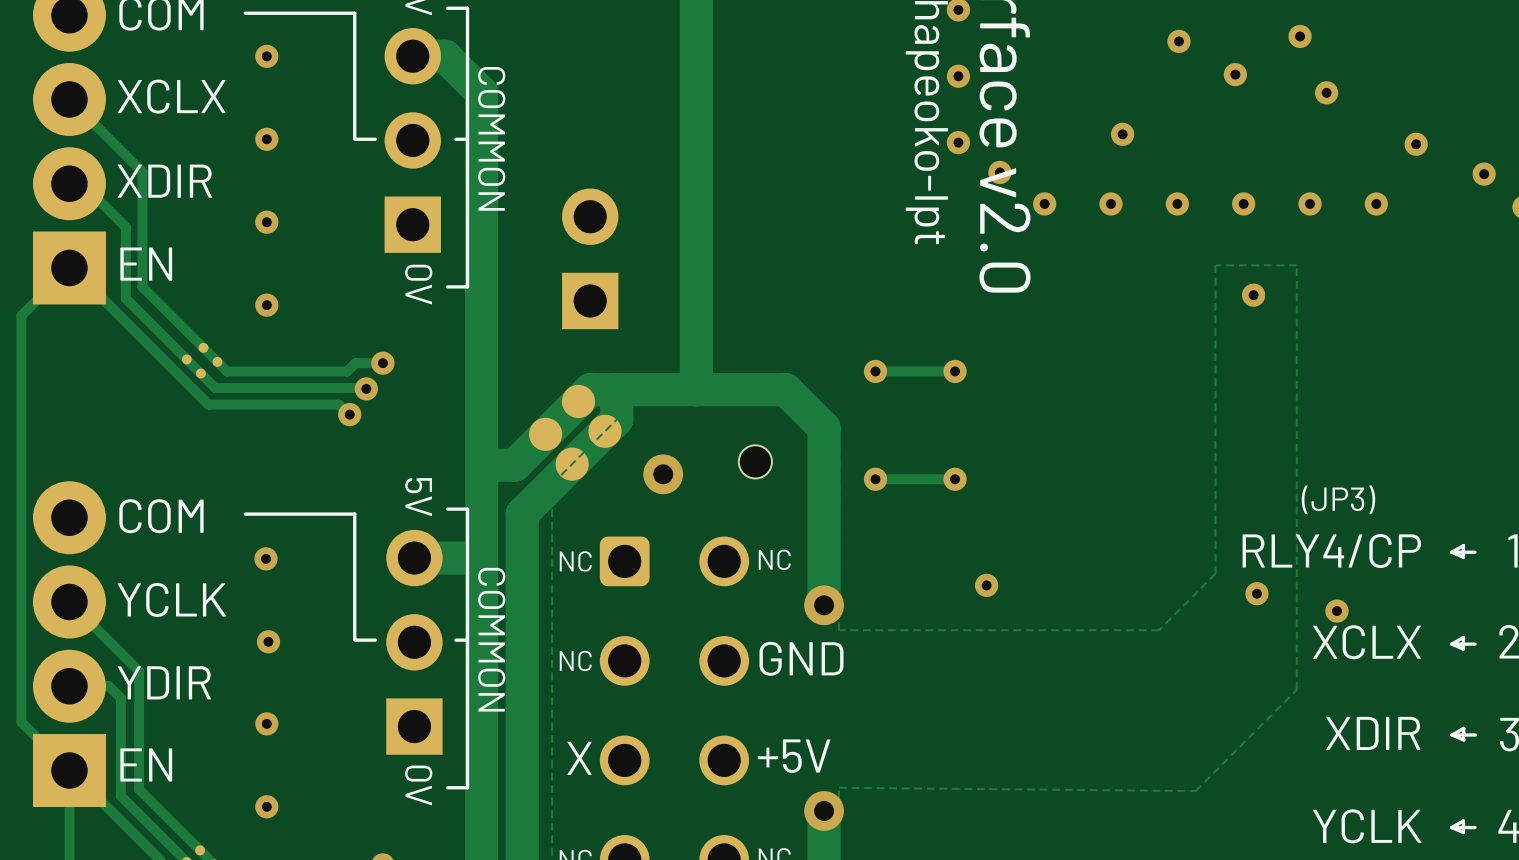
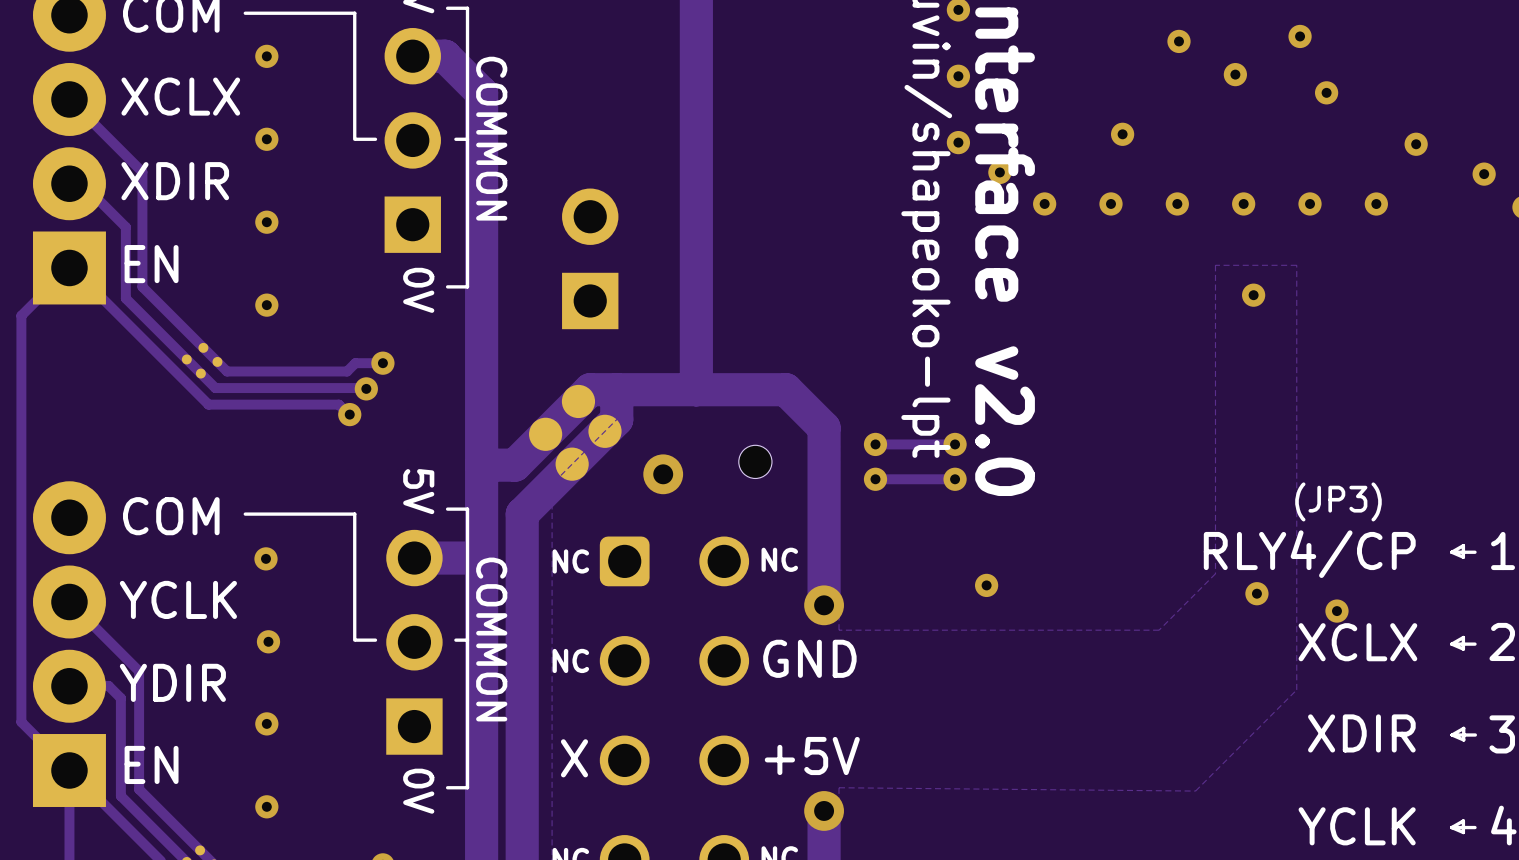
via: (875, 371) -> none
track: (955, 371) (875, 371) -> (955, 444) (875, 444)
via: (955, 371) -> none
via: none -> (875, 444)
via: none -> (955, 444)

